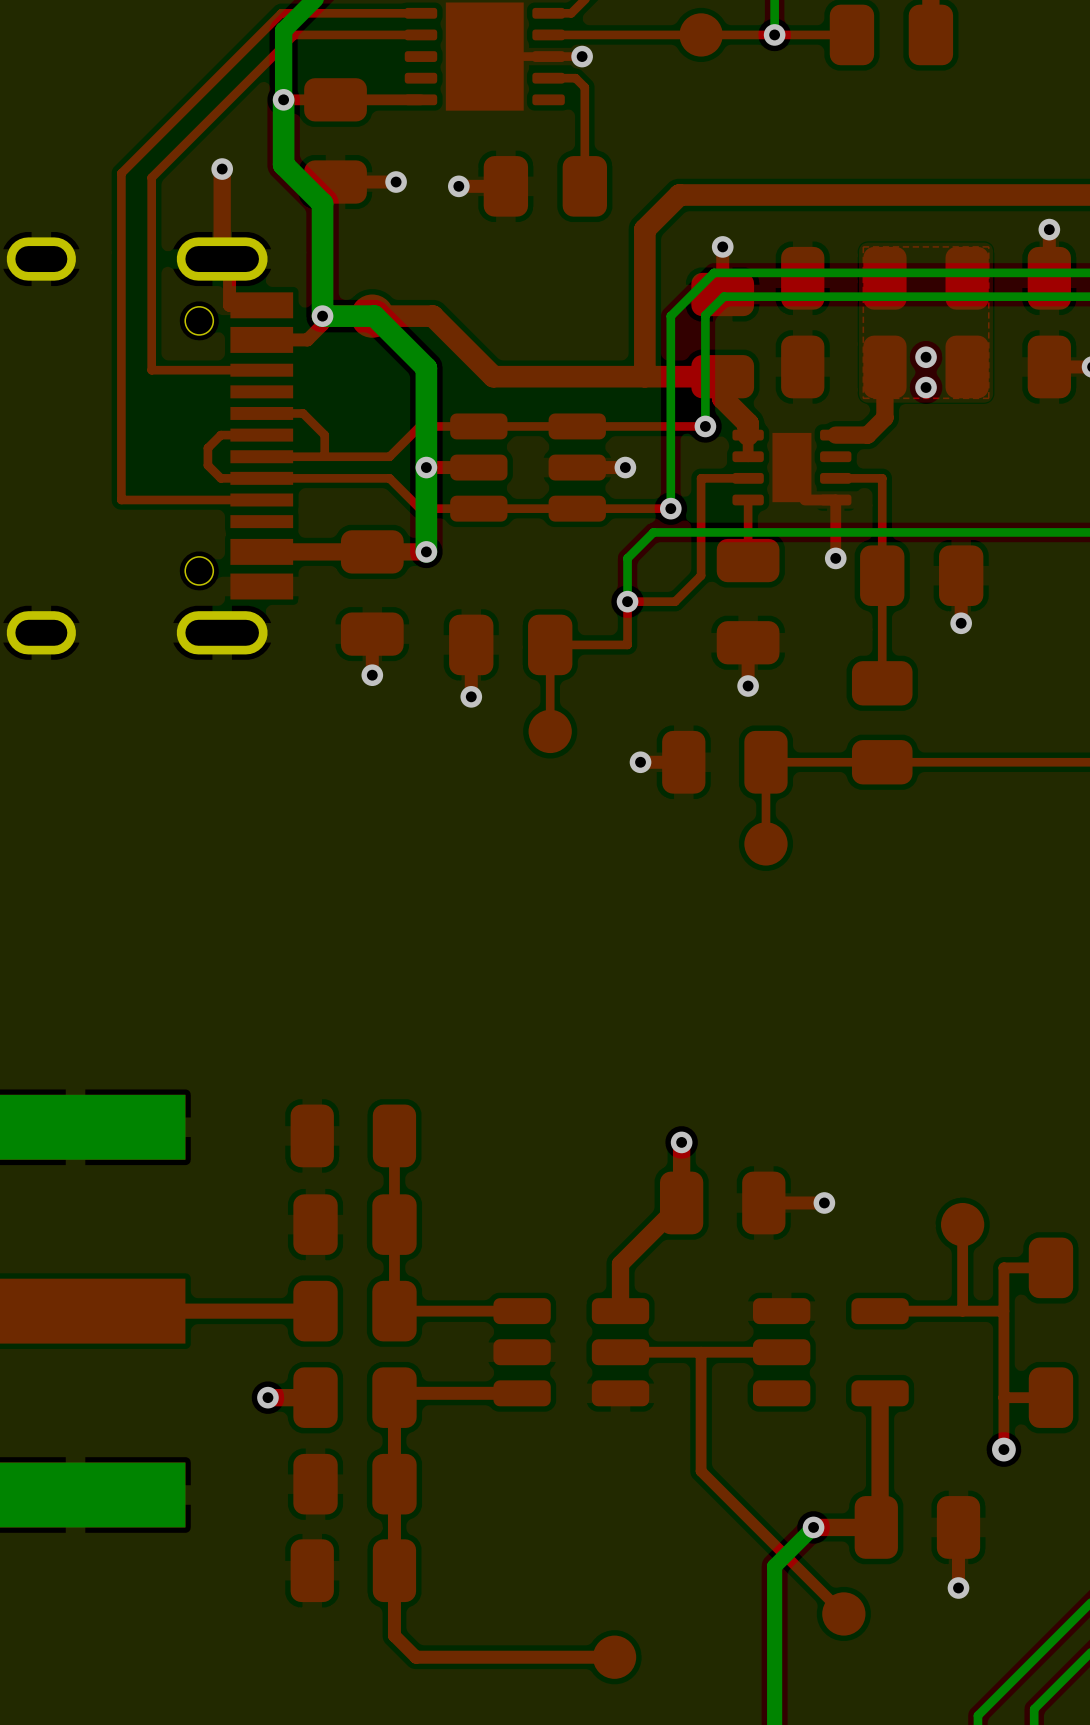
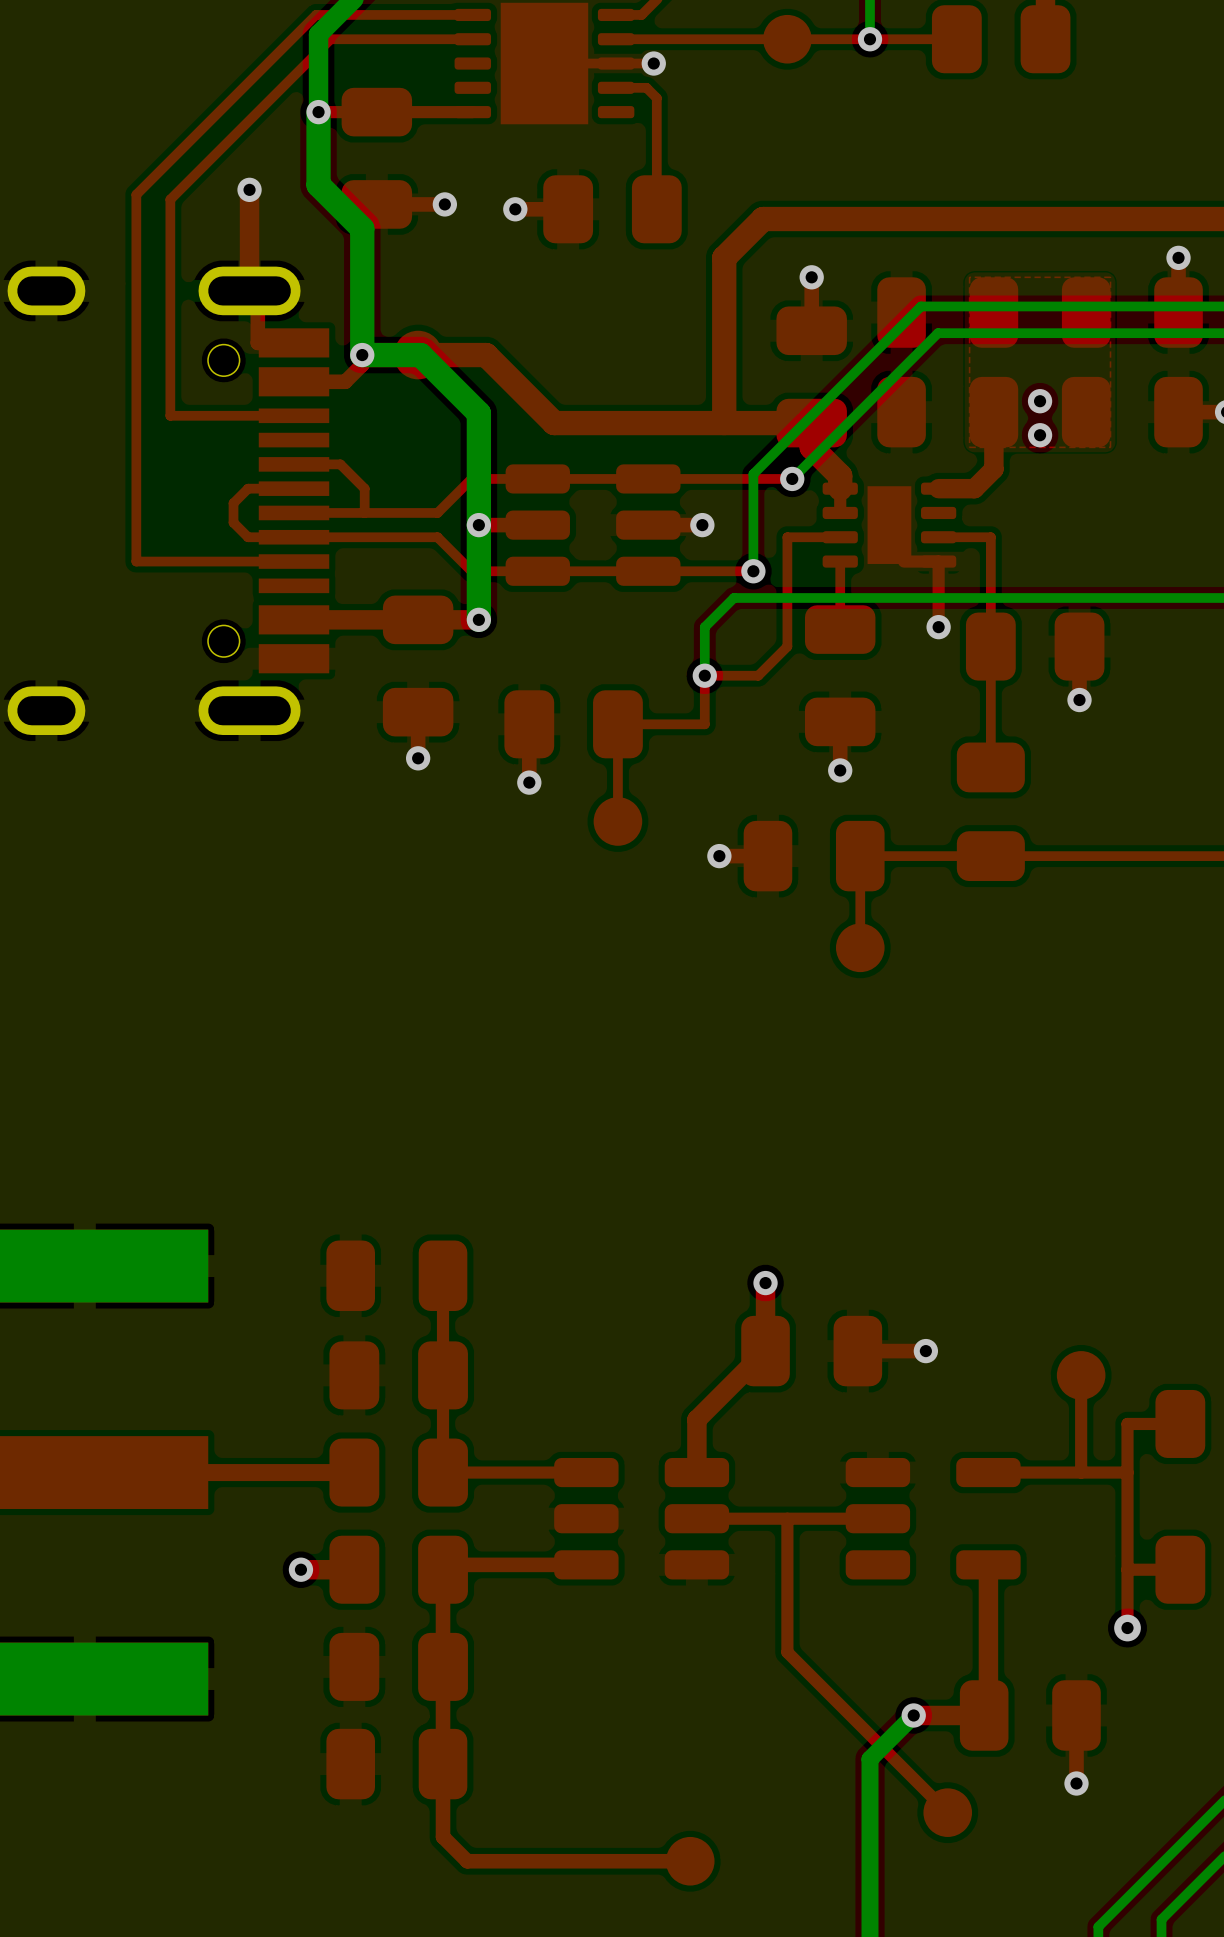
bottom track: (820, 272) (714, 272) (670, 316) (670, 422) -> (921, 306) (753, 474)
bottom track: (835, 296) (724, 296) (705, 315) (705, 426) -> (938, 333) (792, 478)

